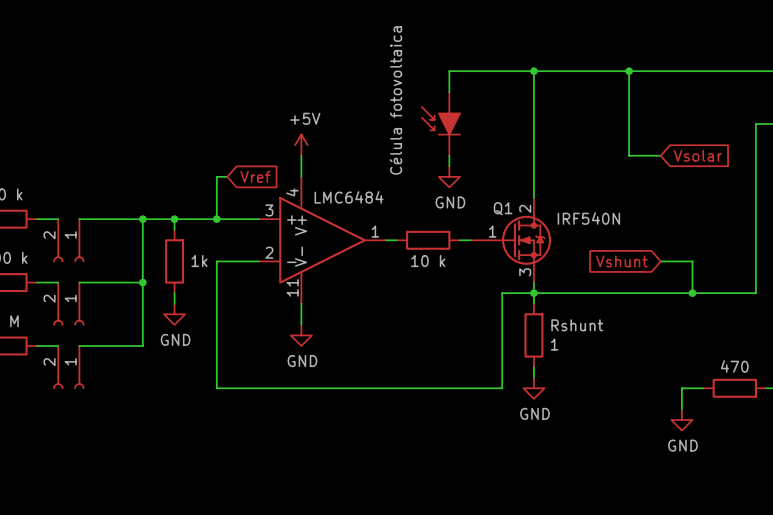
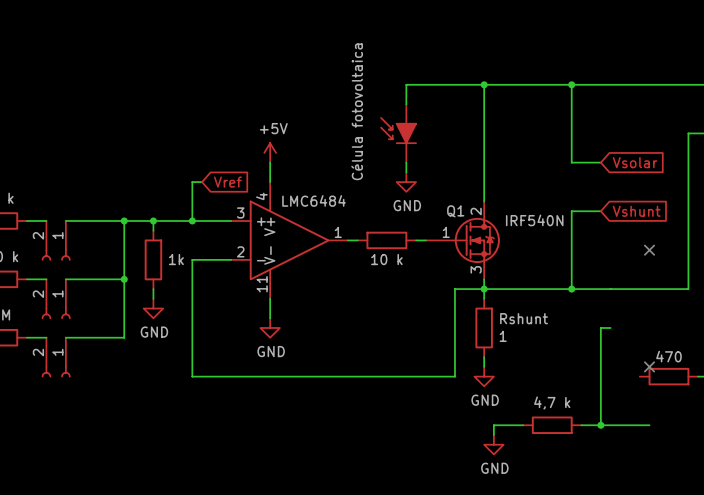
wire: none -> (600, 211) (571, 211) (571, 289)
no-connect mark: none -> (649, 250)
global label rotation: 0° (621, 261) -> 180° (636, 211)
global label position: Vshunt (621, 261) -> Vshunt (636, 211)
wire: (660, 261) (692, 261) (692, 293) -> none
junction: none -> (571, 289)
junction: (692, 293) -> none
wire: none -> (610, 327) (600, 327) (600, 425)
no-connect mark: none -> (649, 366)
wire: (703, 388) (681, 388) (681, 409) -> none
power symbol: GND (681, 419) -> none
wire: none -> (523, 425) (493, 425) (493, 434)
part: none -> 4,7 k (552, 425)
wire: none -> (581, 425) (649, 425)
junction: none -> (600, 425)
power symbol: none -> GND (493, 444)

